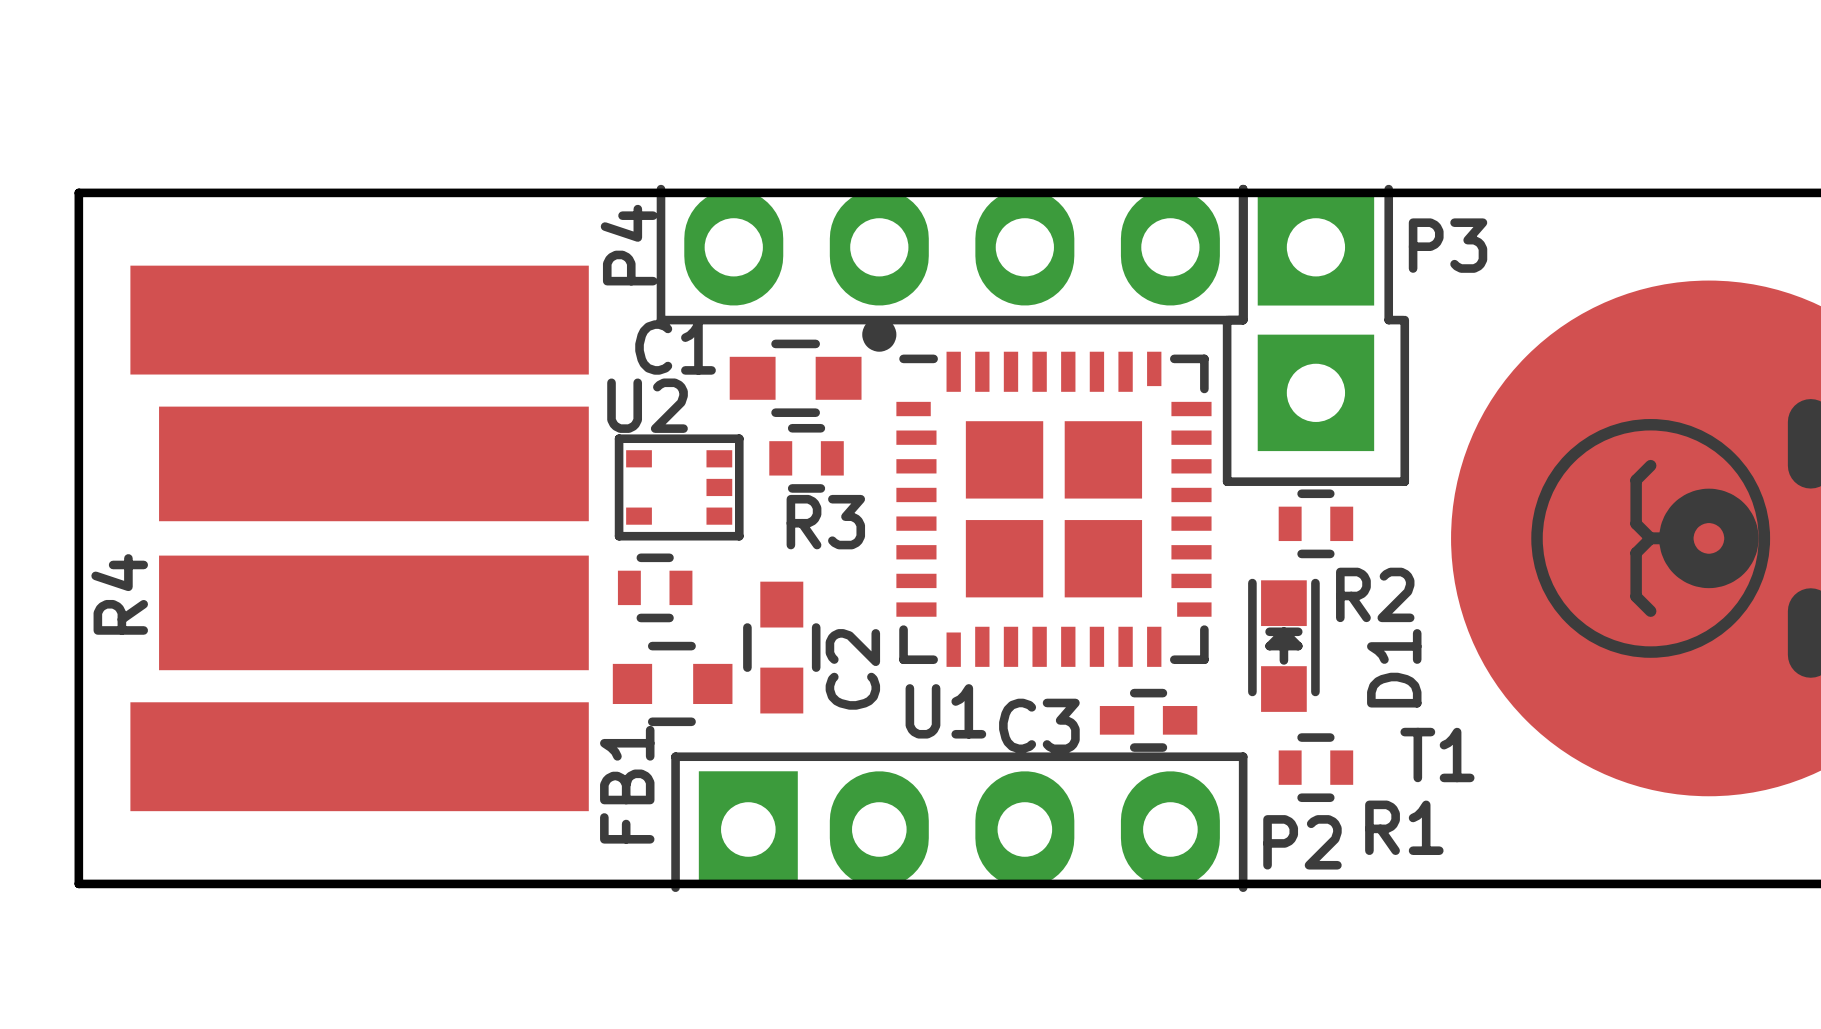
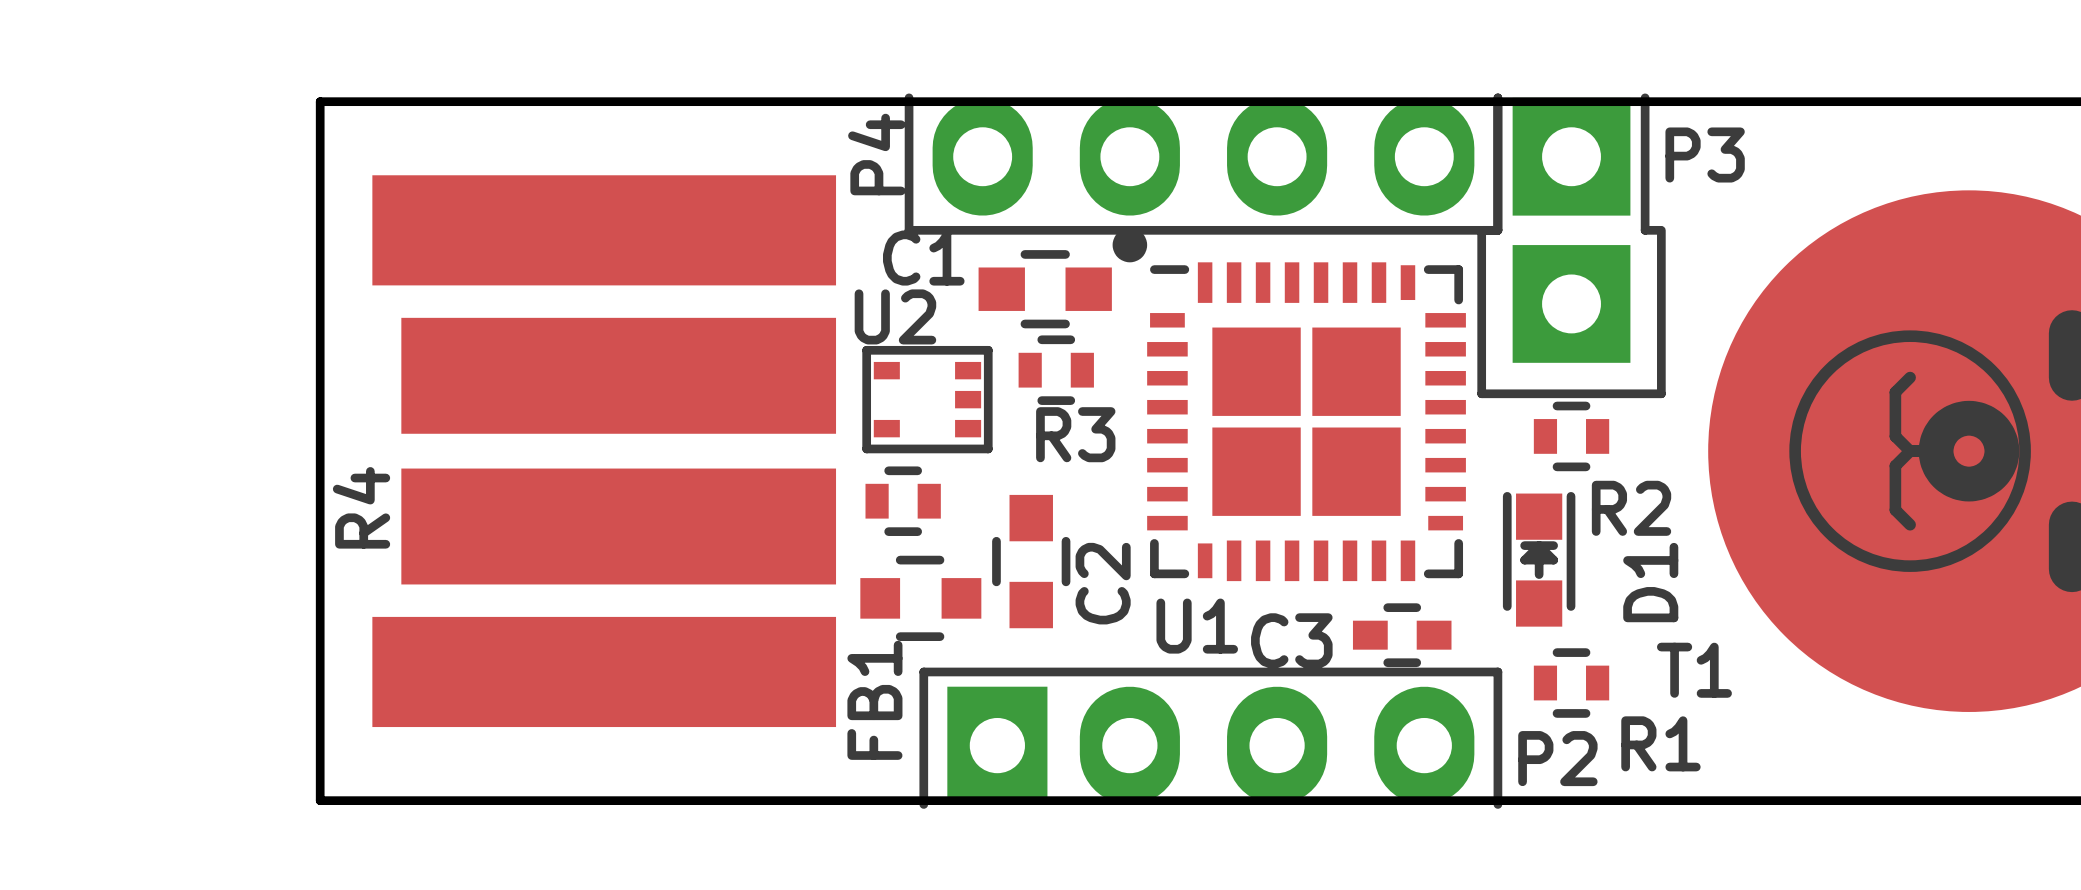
U1 footprint: [862, 317, 1212, 667] -> [1112, 227, 1466, 582]

